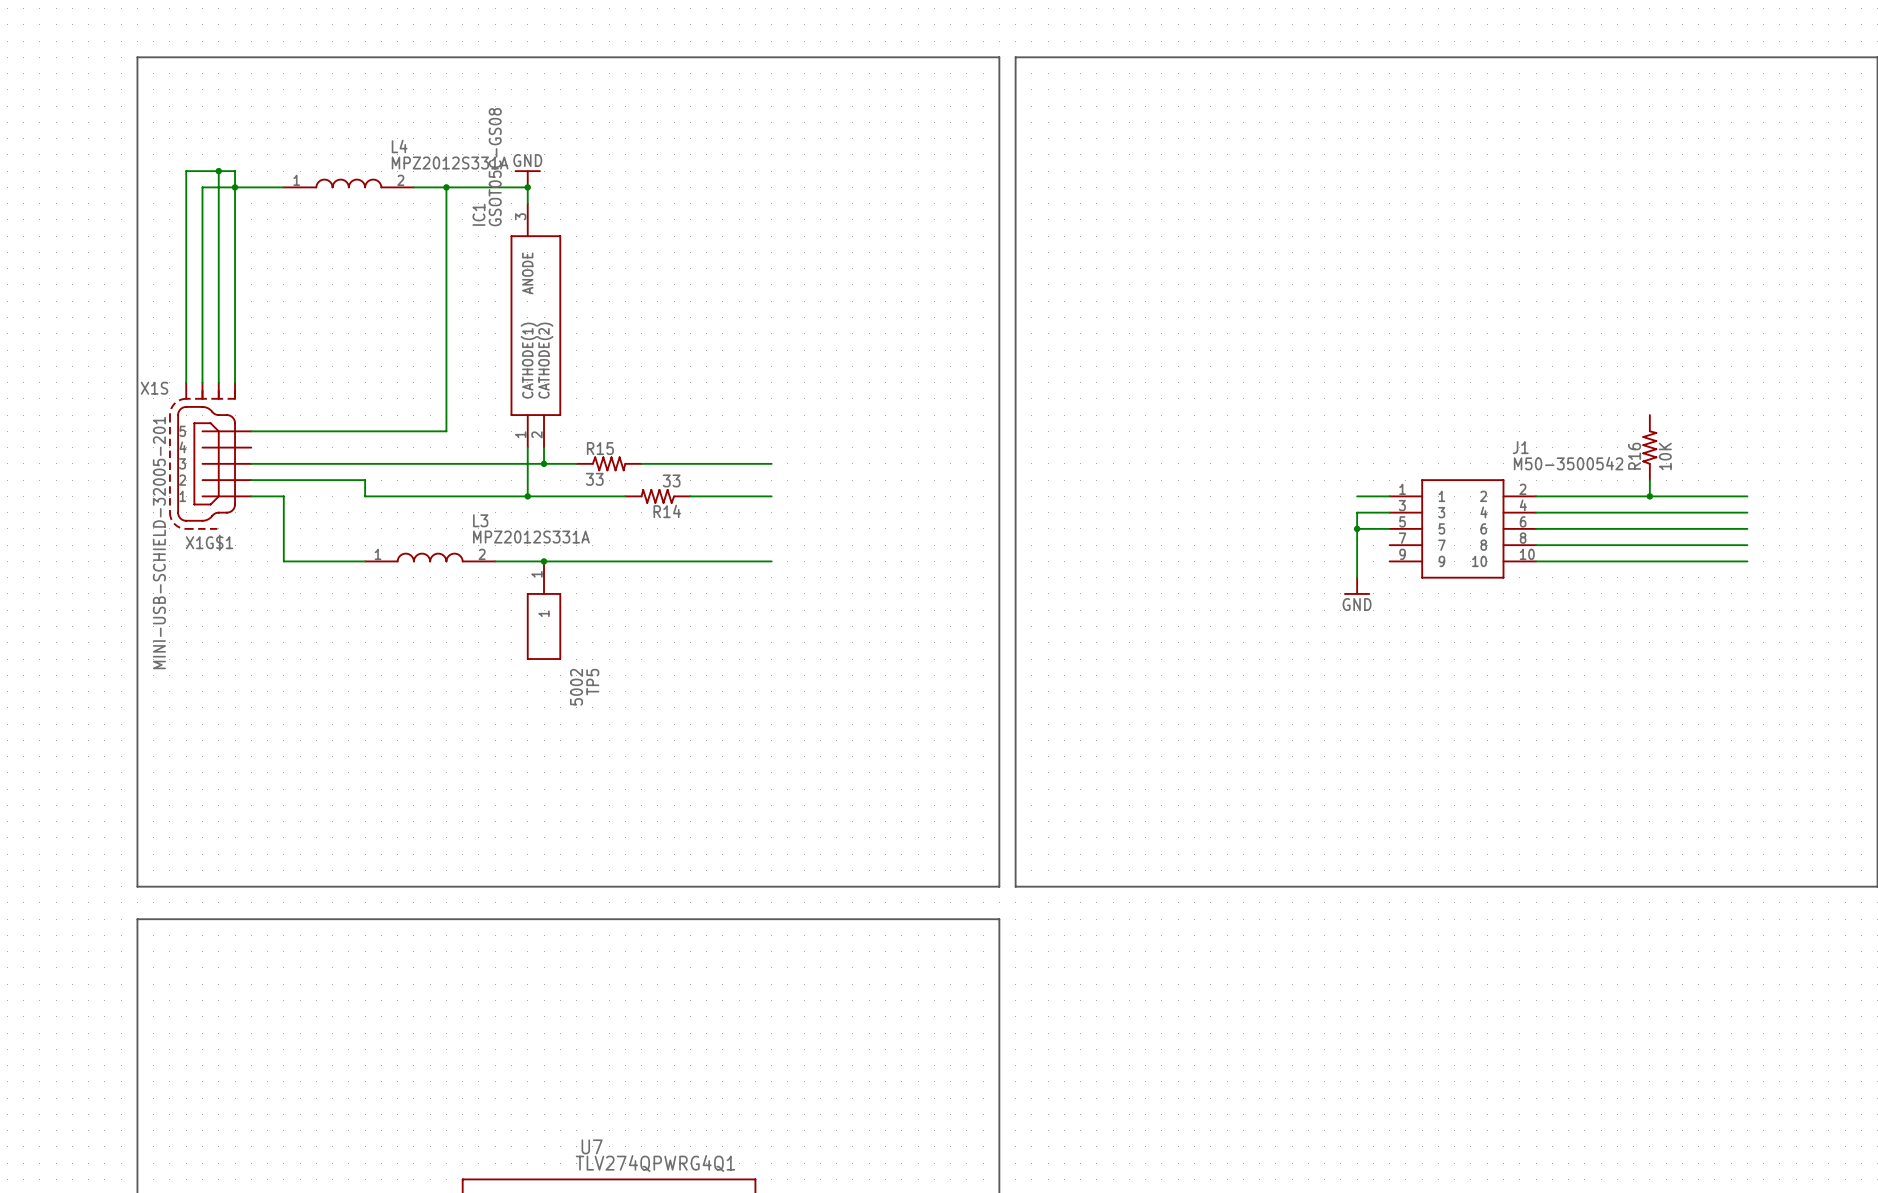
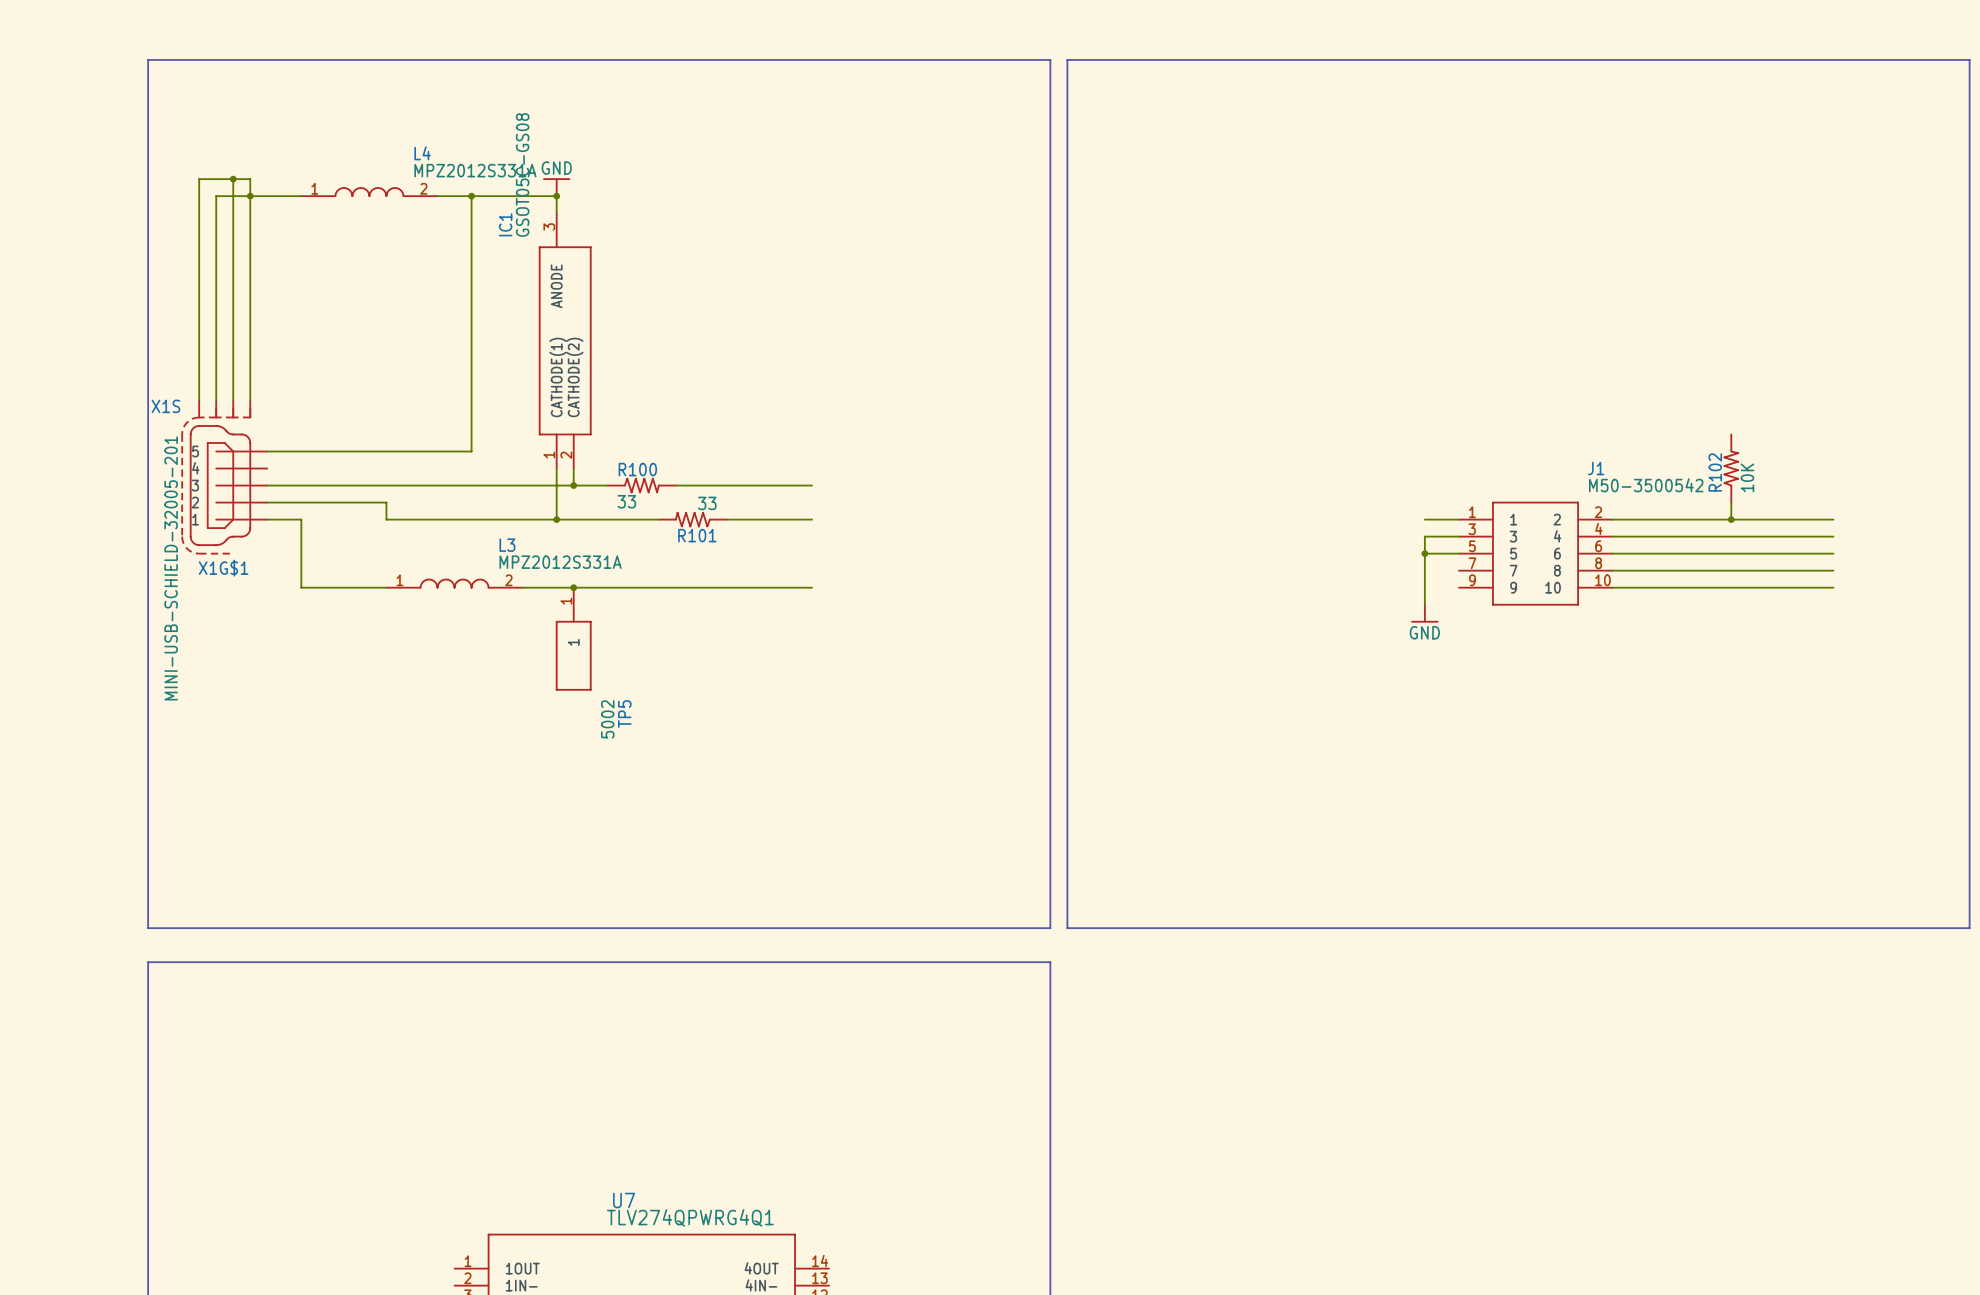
R15 name: R15 (600, 448) -> R100 (637, 469)
R16 name: R16 (1634, 456) -> R102 (1715, 472)
R14 name: R14 (667, 511) -> R101 (697, 535)

